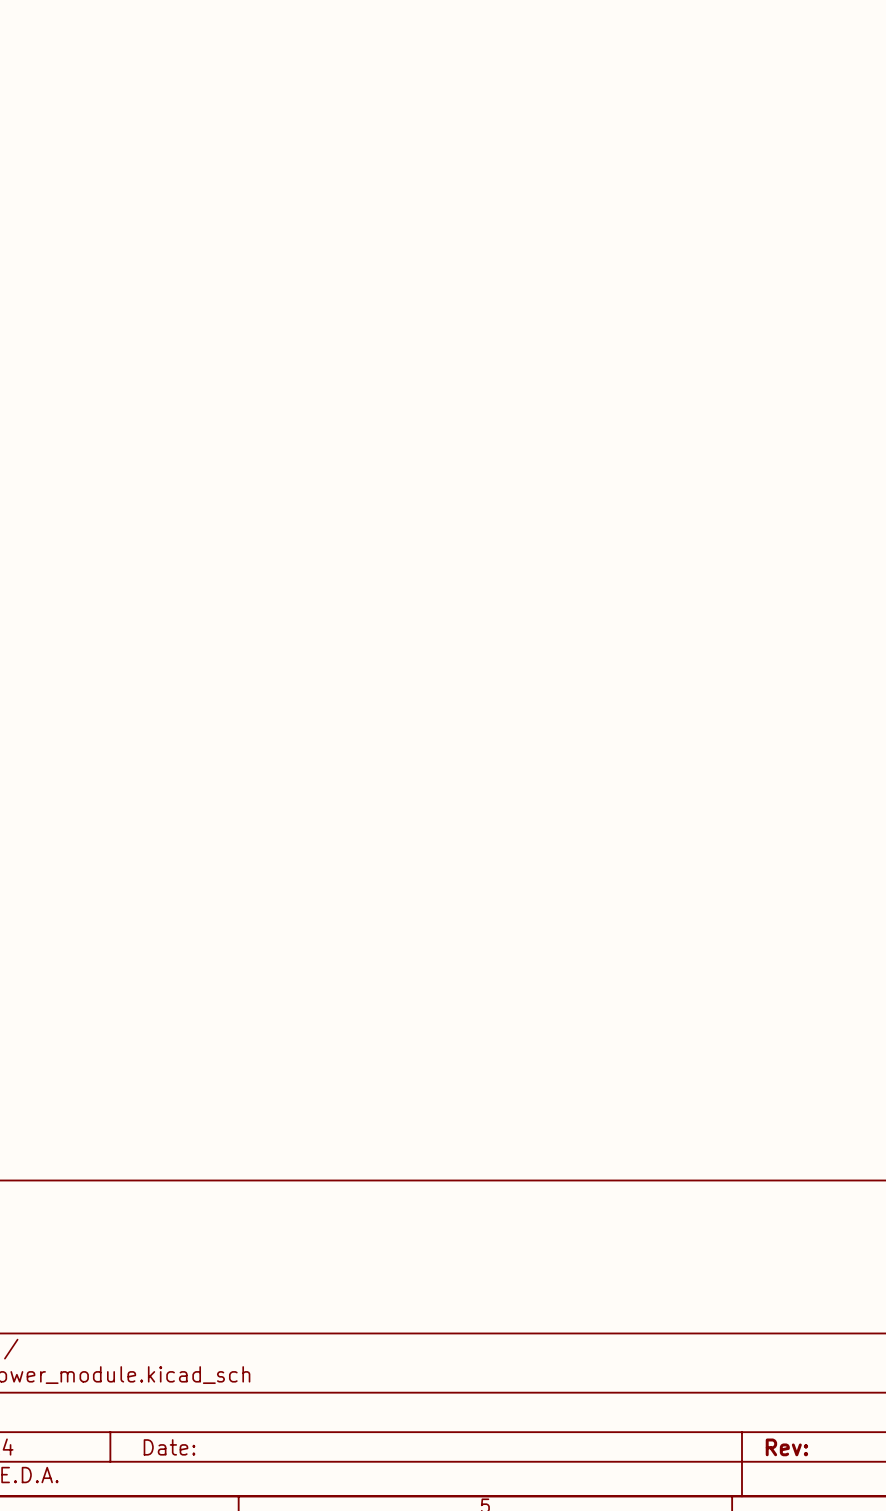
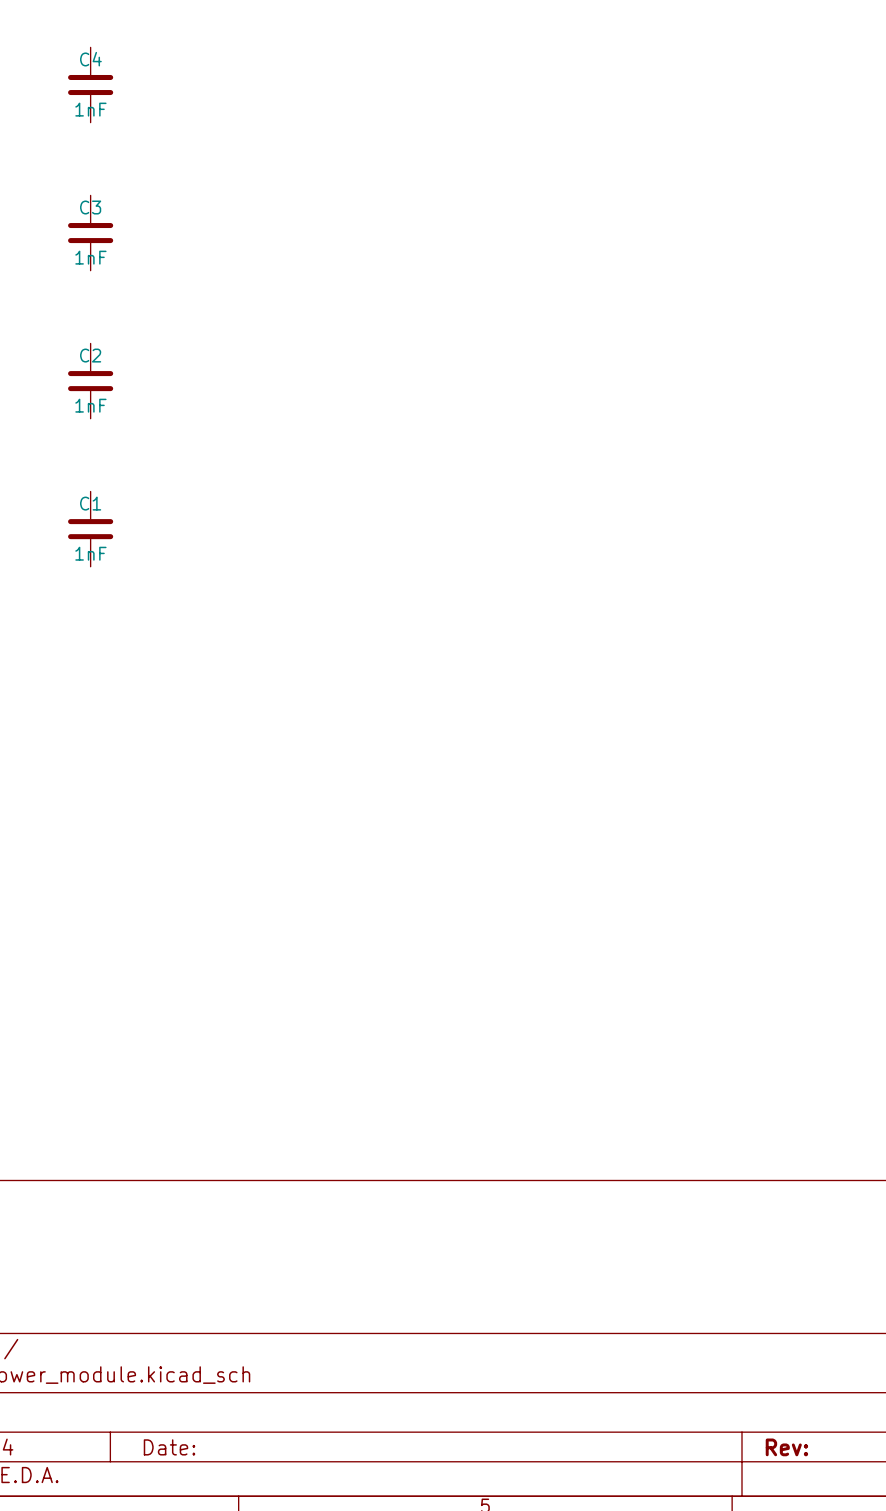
C4: none -> 1nF (90, 85)
C3: none -> 1nF (90, 233)
C2: none -> 1nF (90, 381)
C1: none -> 1nF (90, 529)

